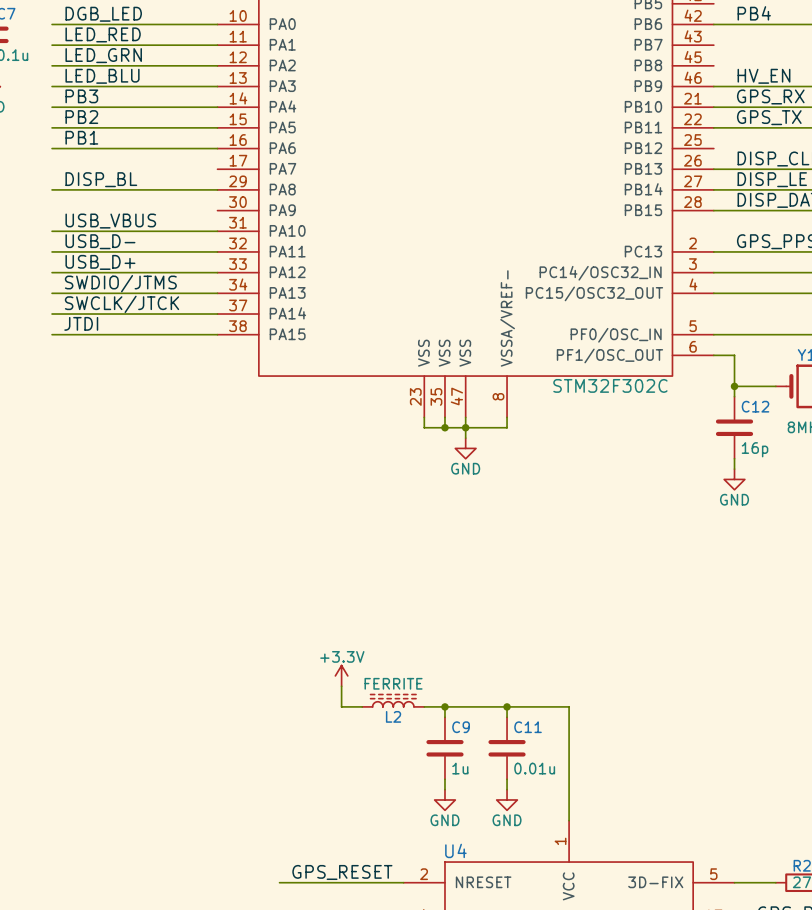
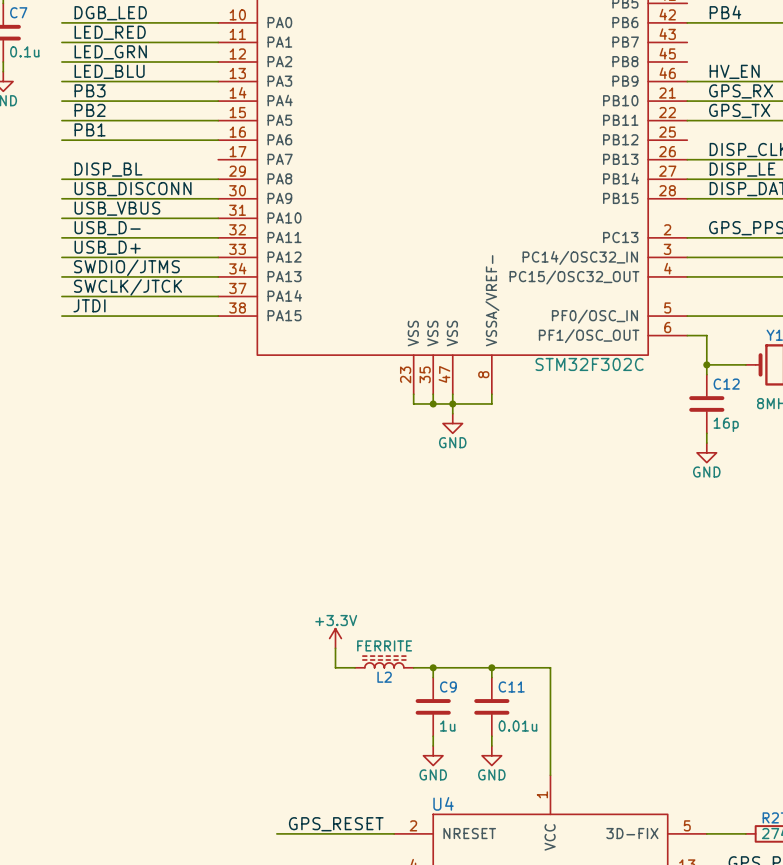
label: none -> USB_DISCONN (133, 189)
wire: none -> (61, 198) (218, 198)

